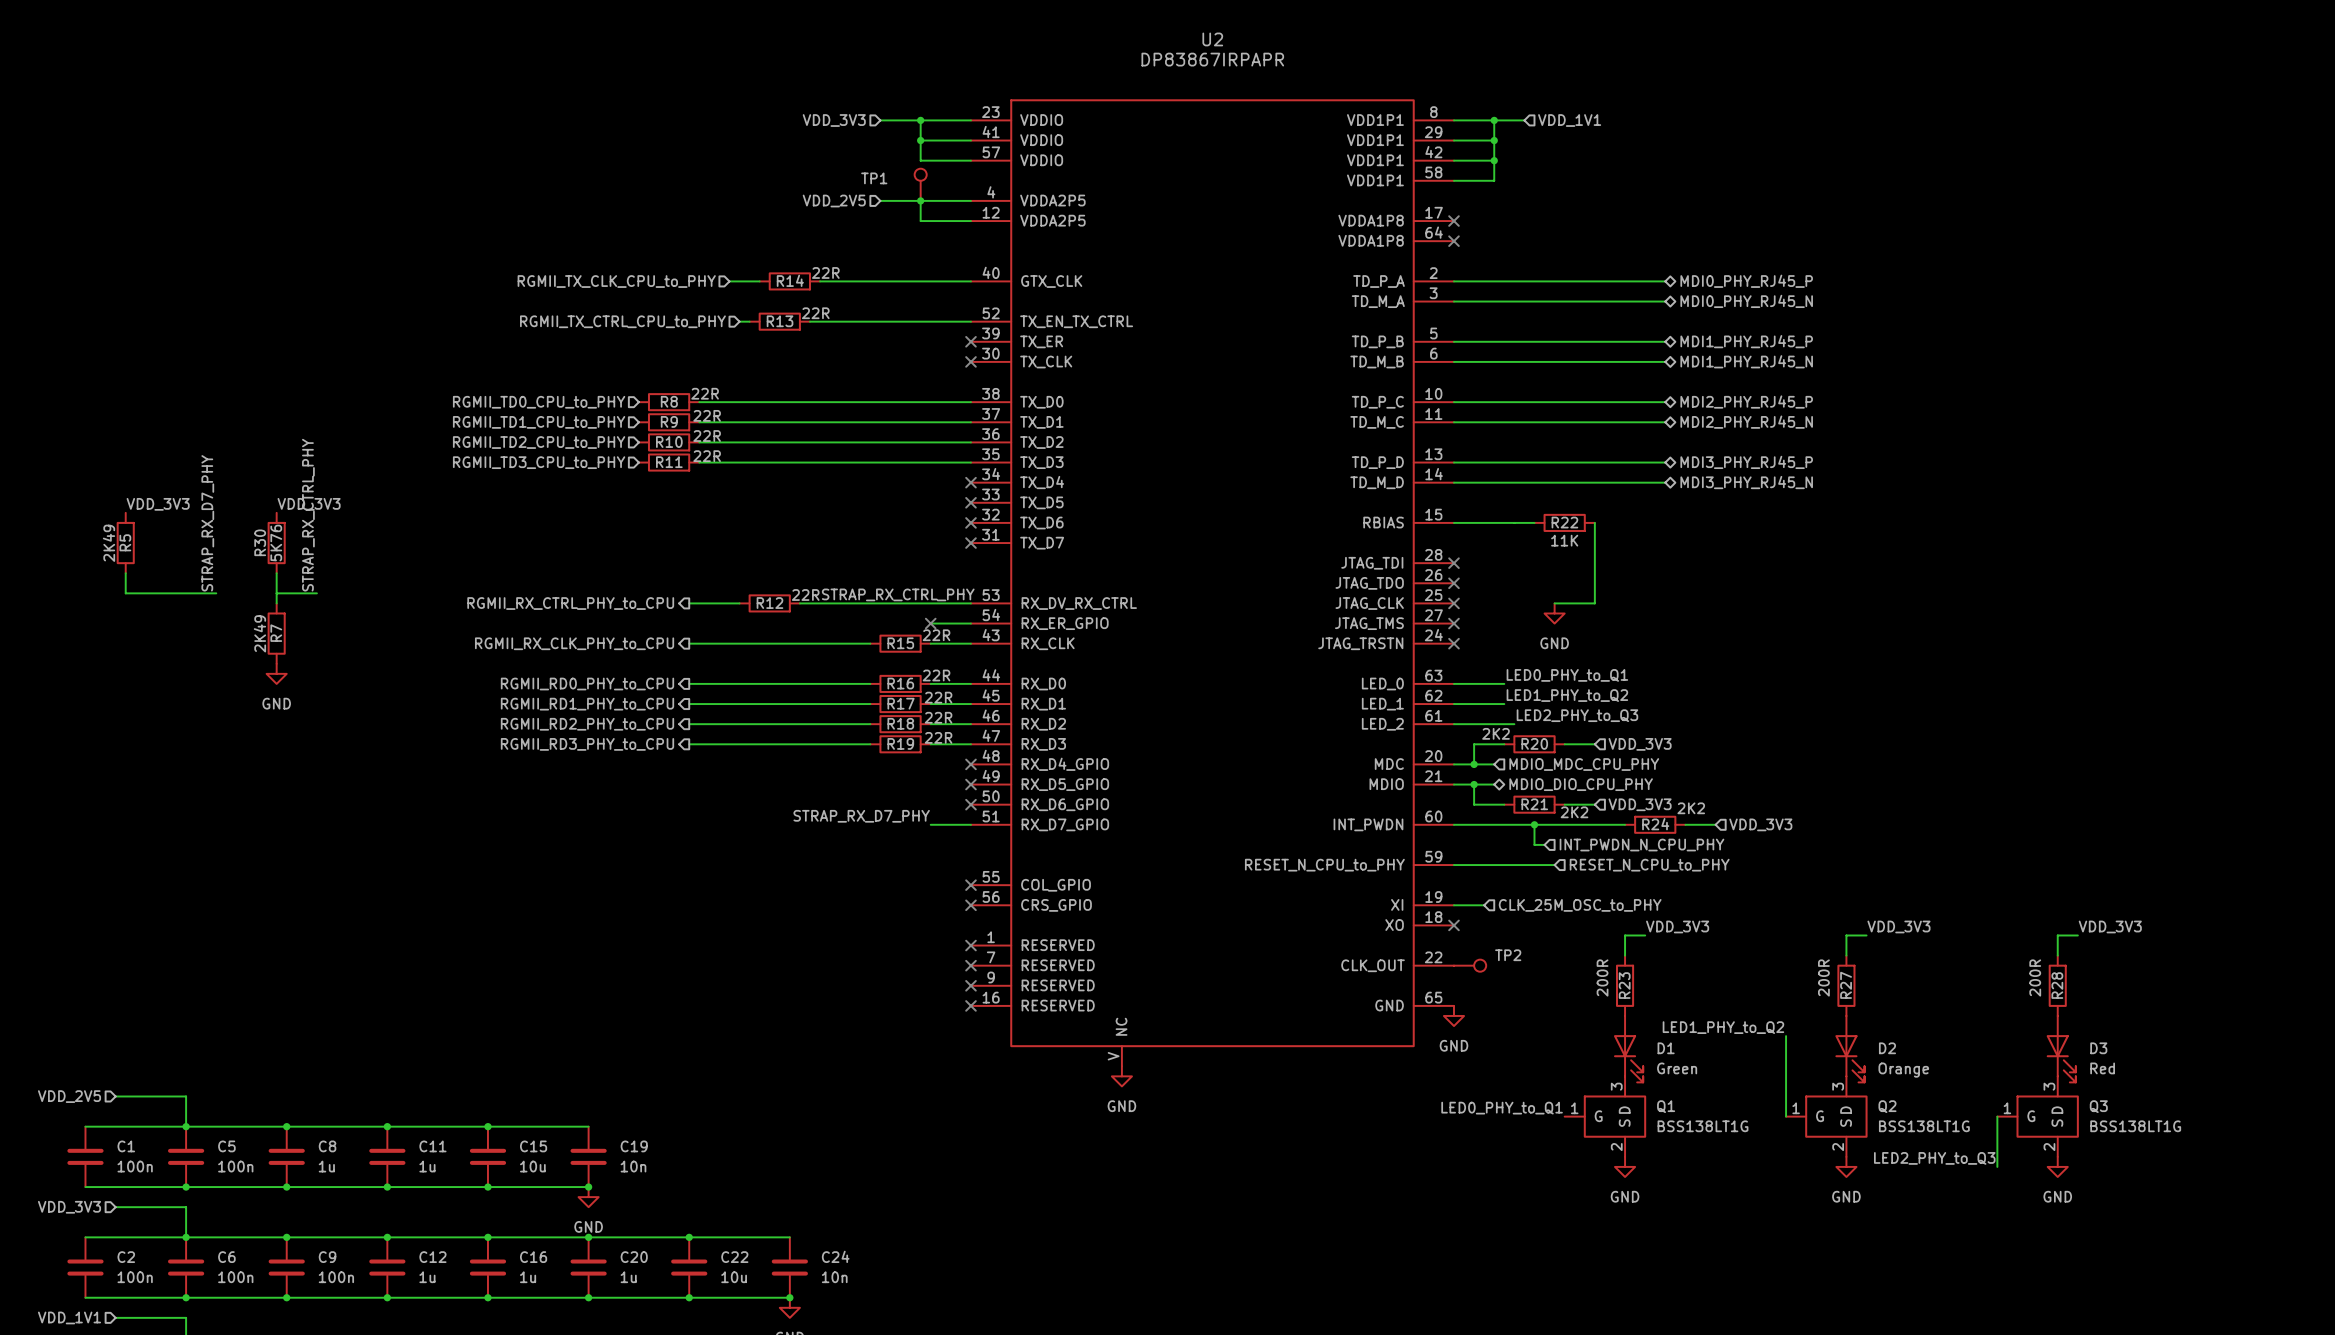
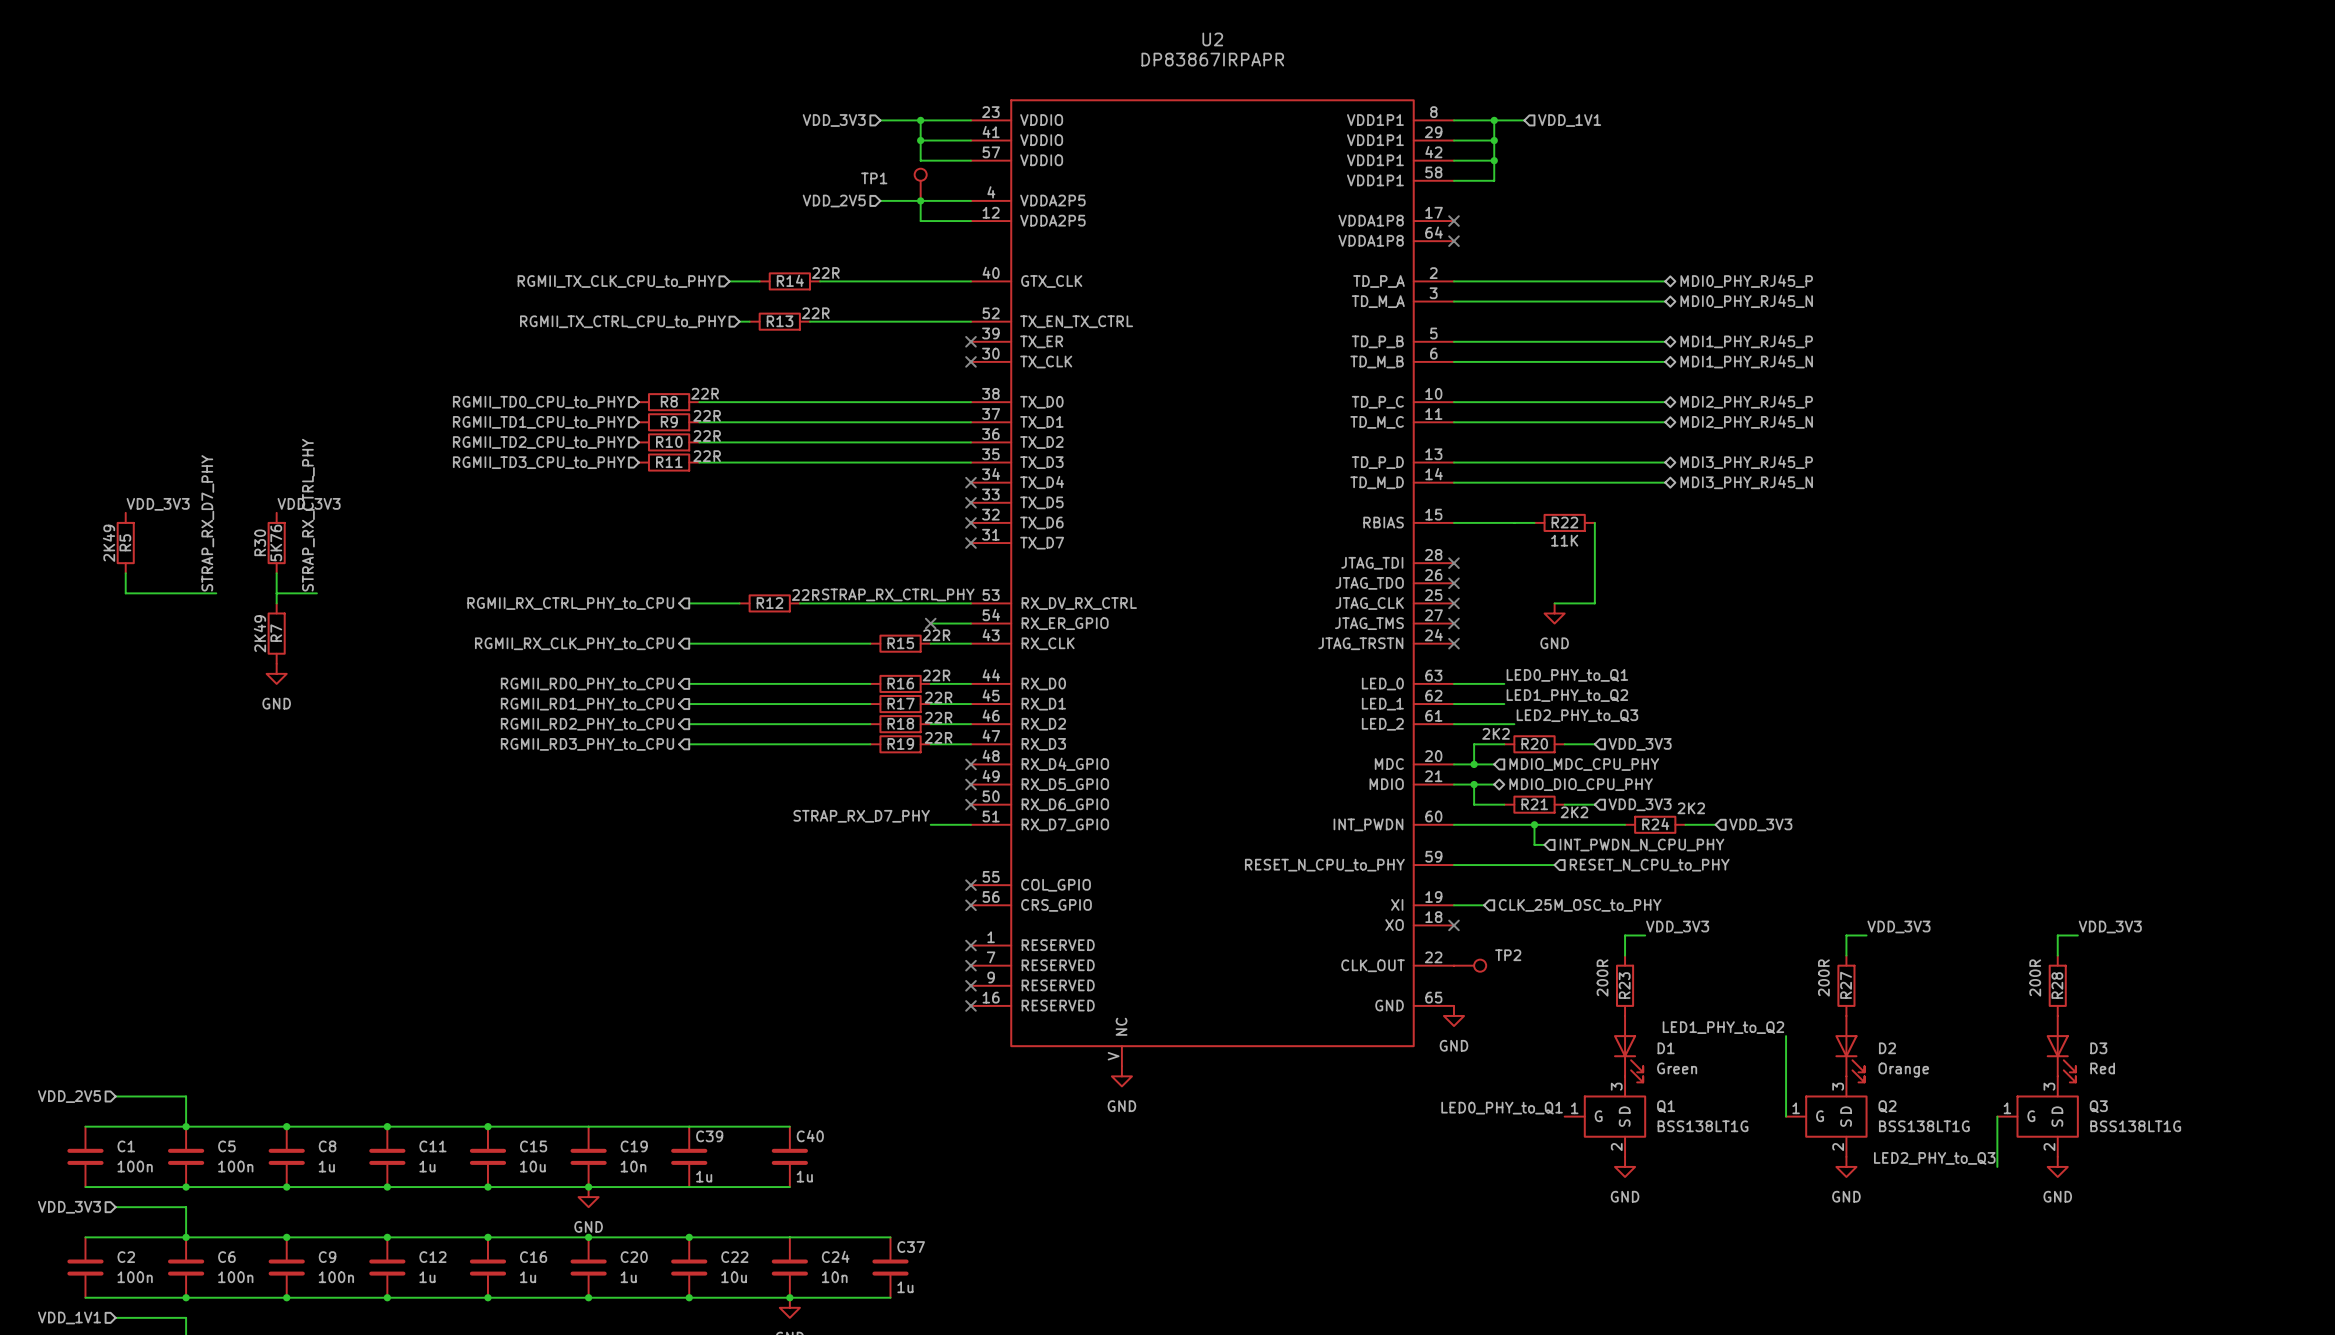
wire: none -> (588, 1126) (789, 1126)
C39: none -> 1u (689, 1156)
C40: none -> 1u (789, 1156)
wire: none -> (588, 1187) (789, 1187)
wire: none -> (789, 1237) (890, 1237)
C37: none -> 1u (890, 1267)
wire: none -> (789, 1297) (890, 1297)

